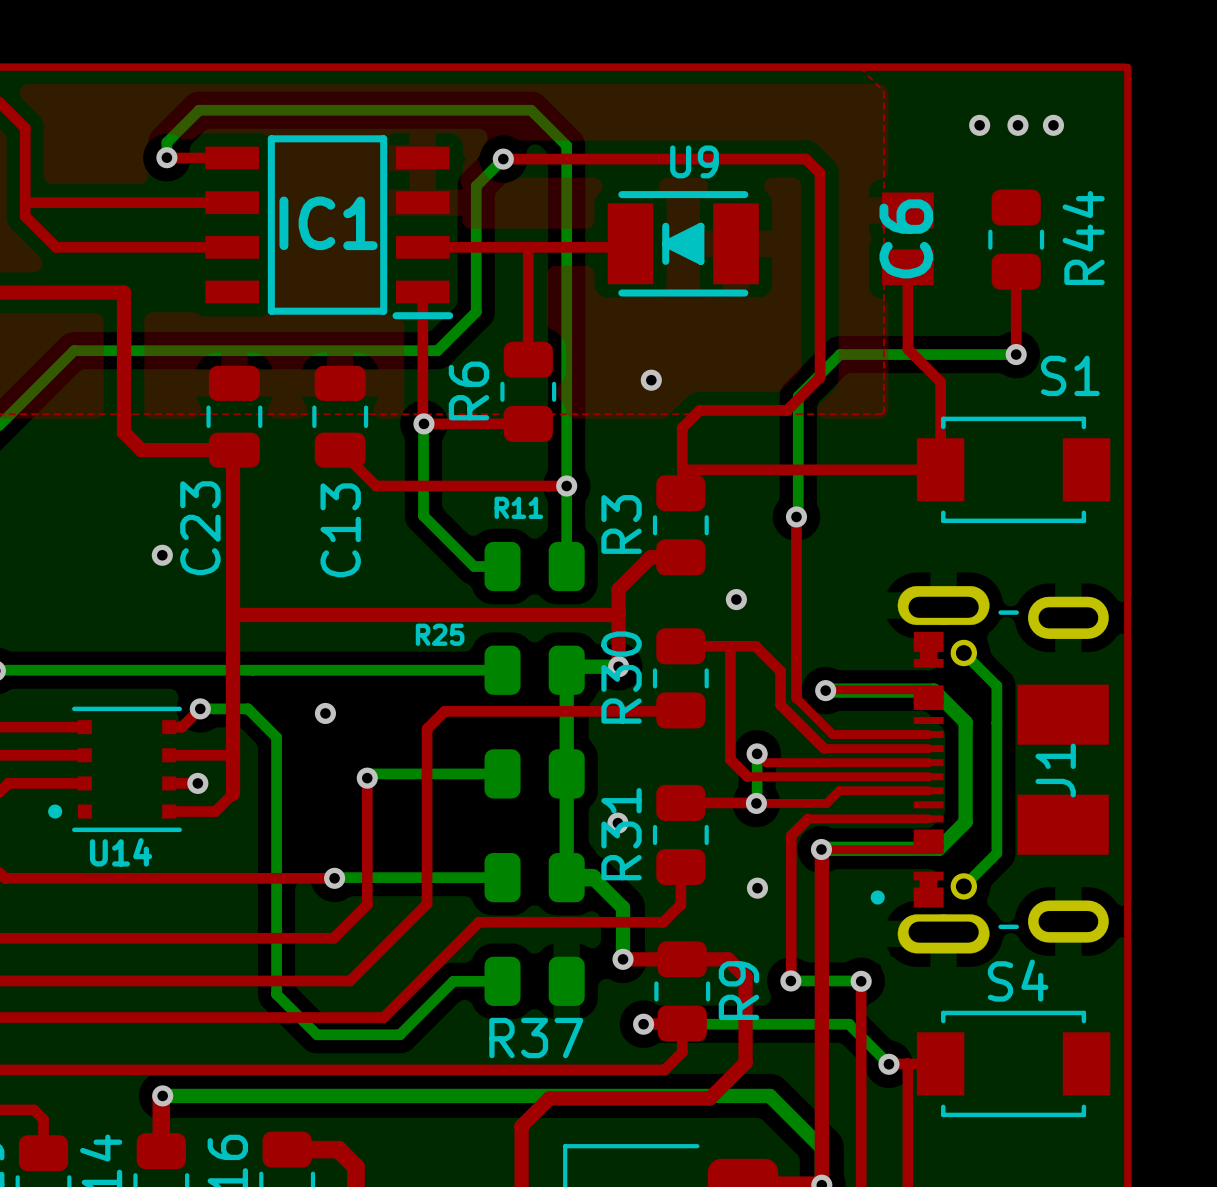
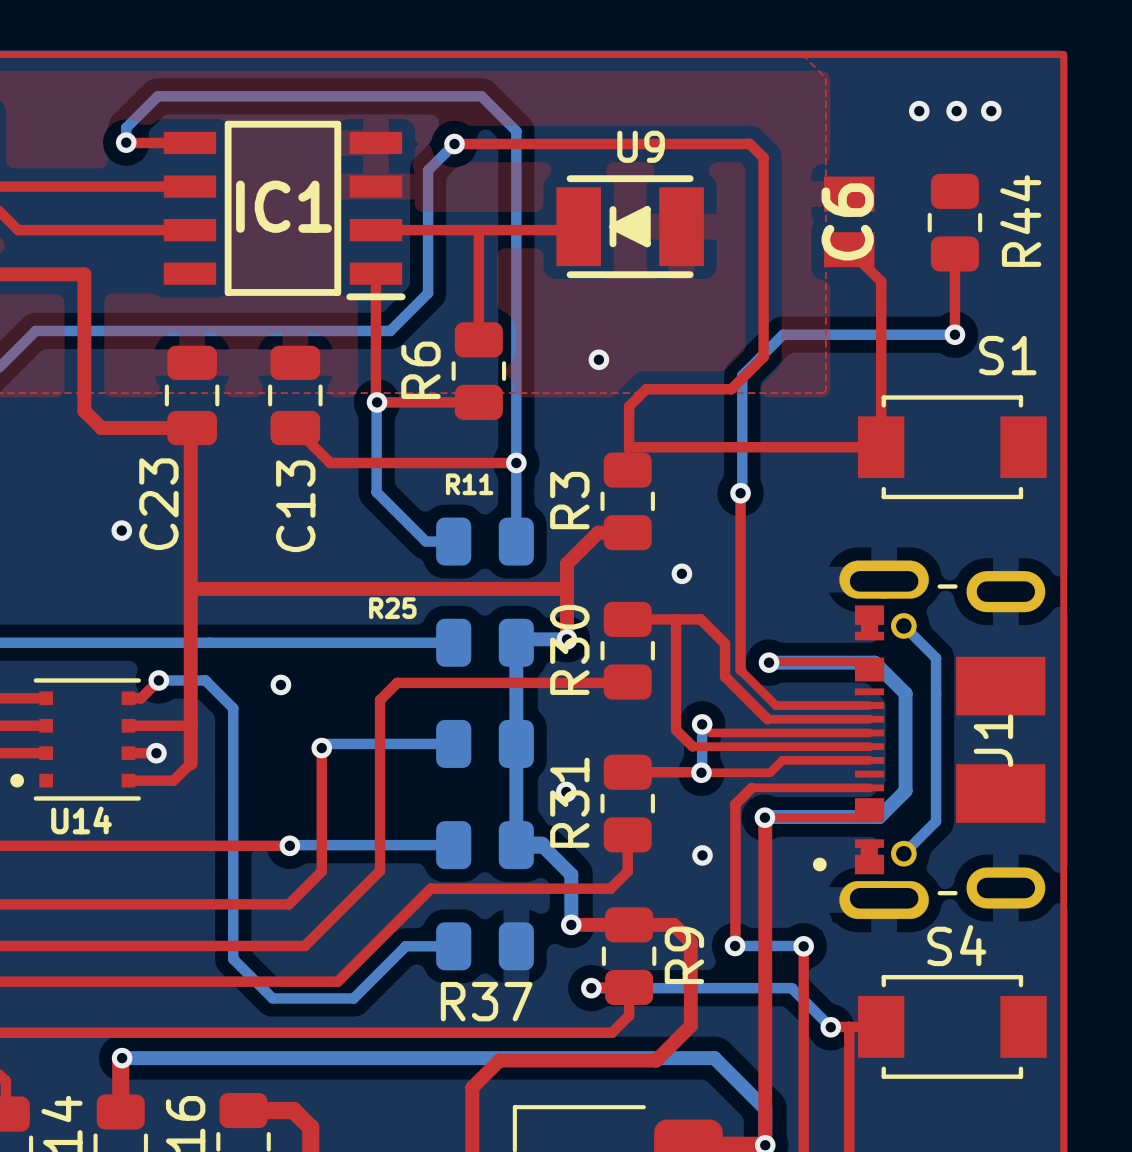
top track: (907, 267) (907, 349) (940, 381) -> (849, 249) (881, 281) (881, 361)

